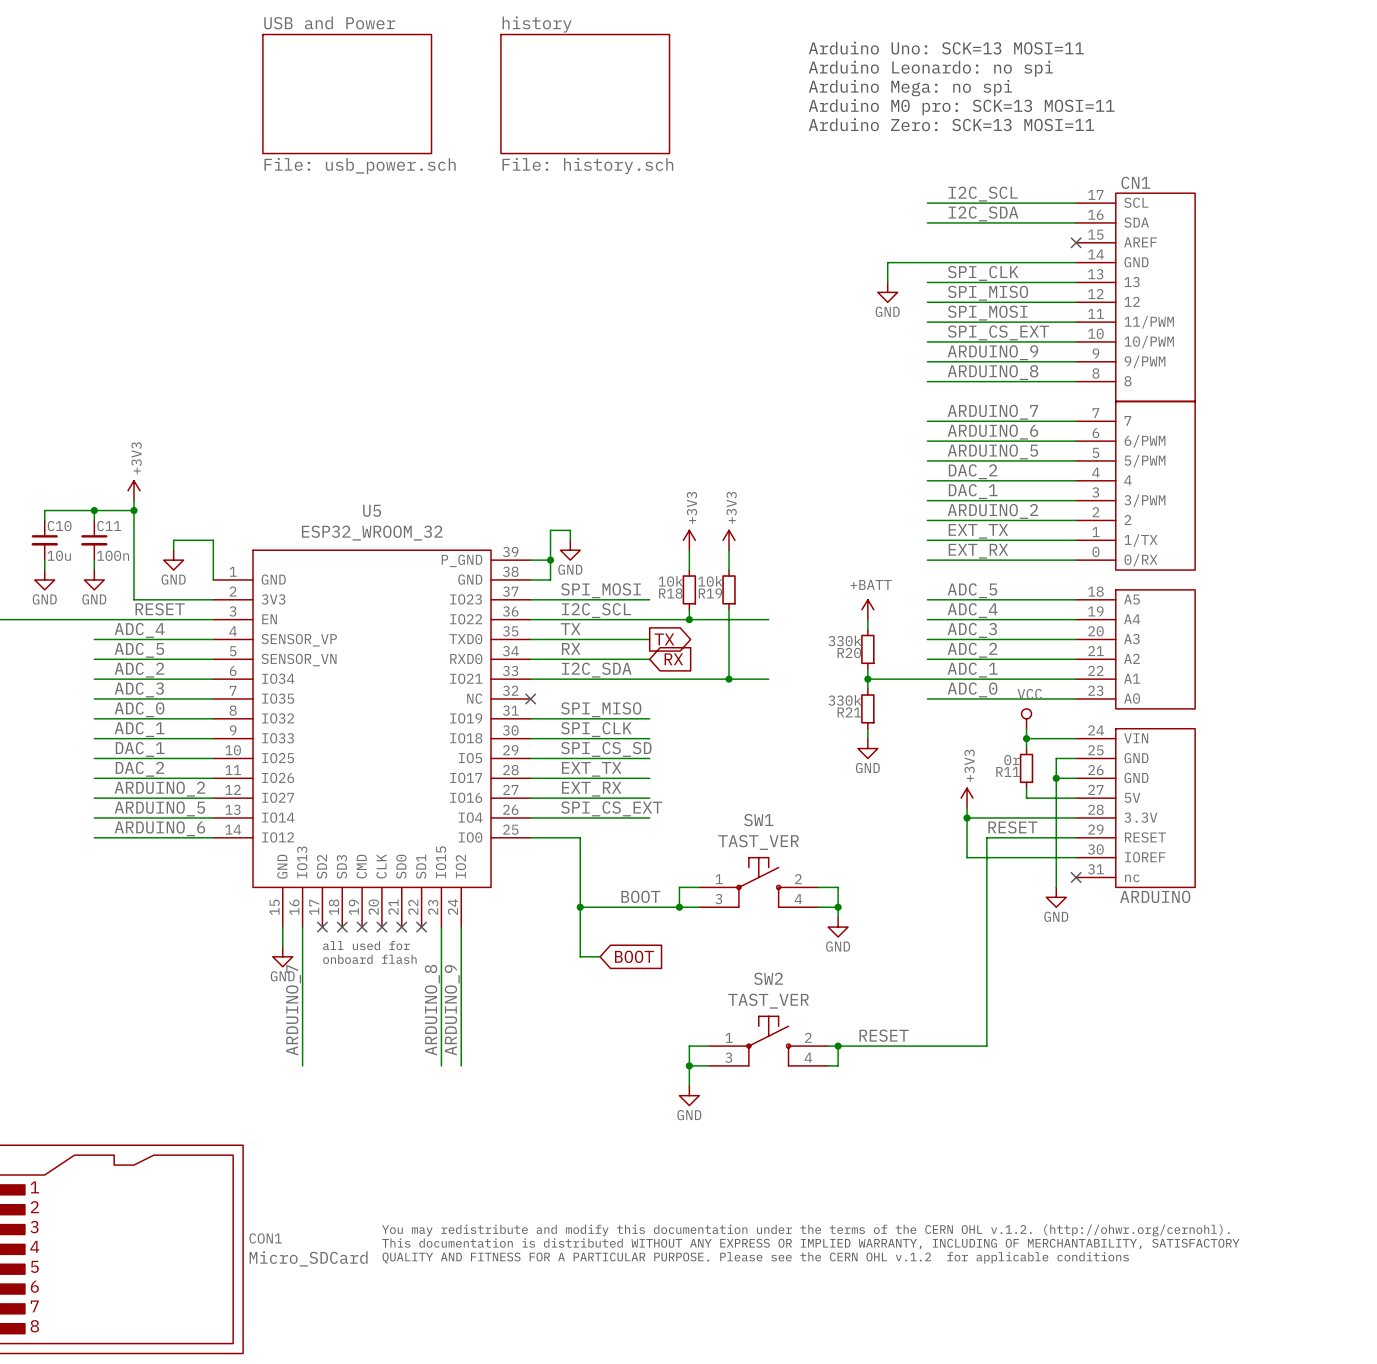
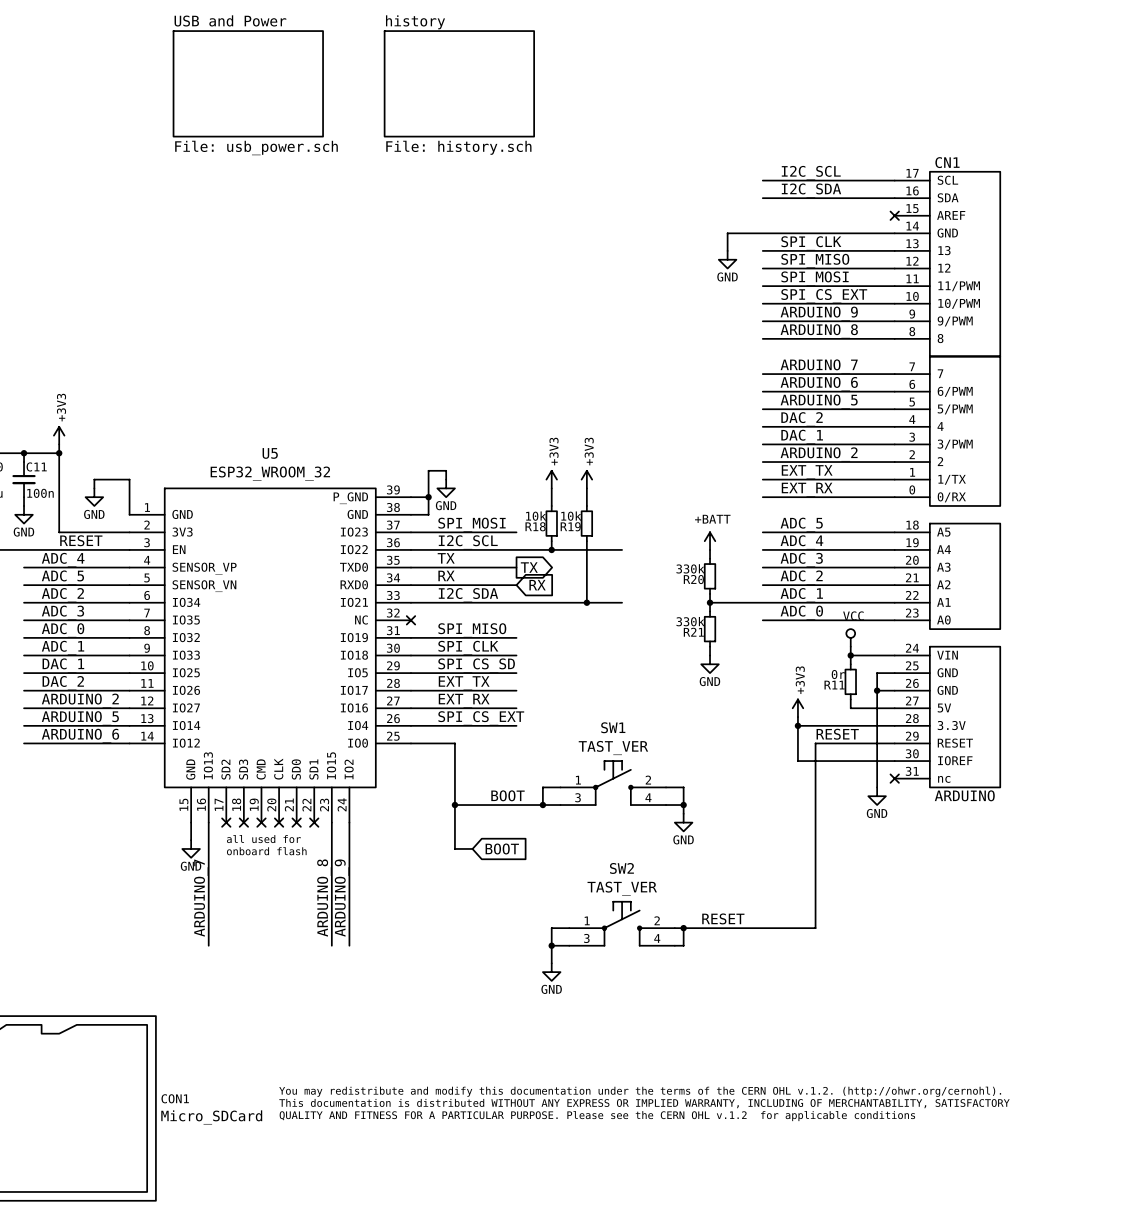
text: Arduino Uno: SCK=13 MOSI=11 (946, 48) -> none
text: Arduino Leonardo: no spi (930, 68) -> none
text: Arduino Mega: no spi (910, 88) -> none
text: Arduino M0 pro: SCK=13 MOSI=11 (961, 107) -> none
text: Arduino Zero: SCK=13 MOSI=11 (951, 124) -> none

